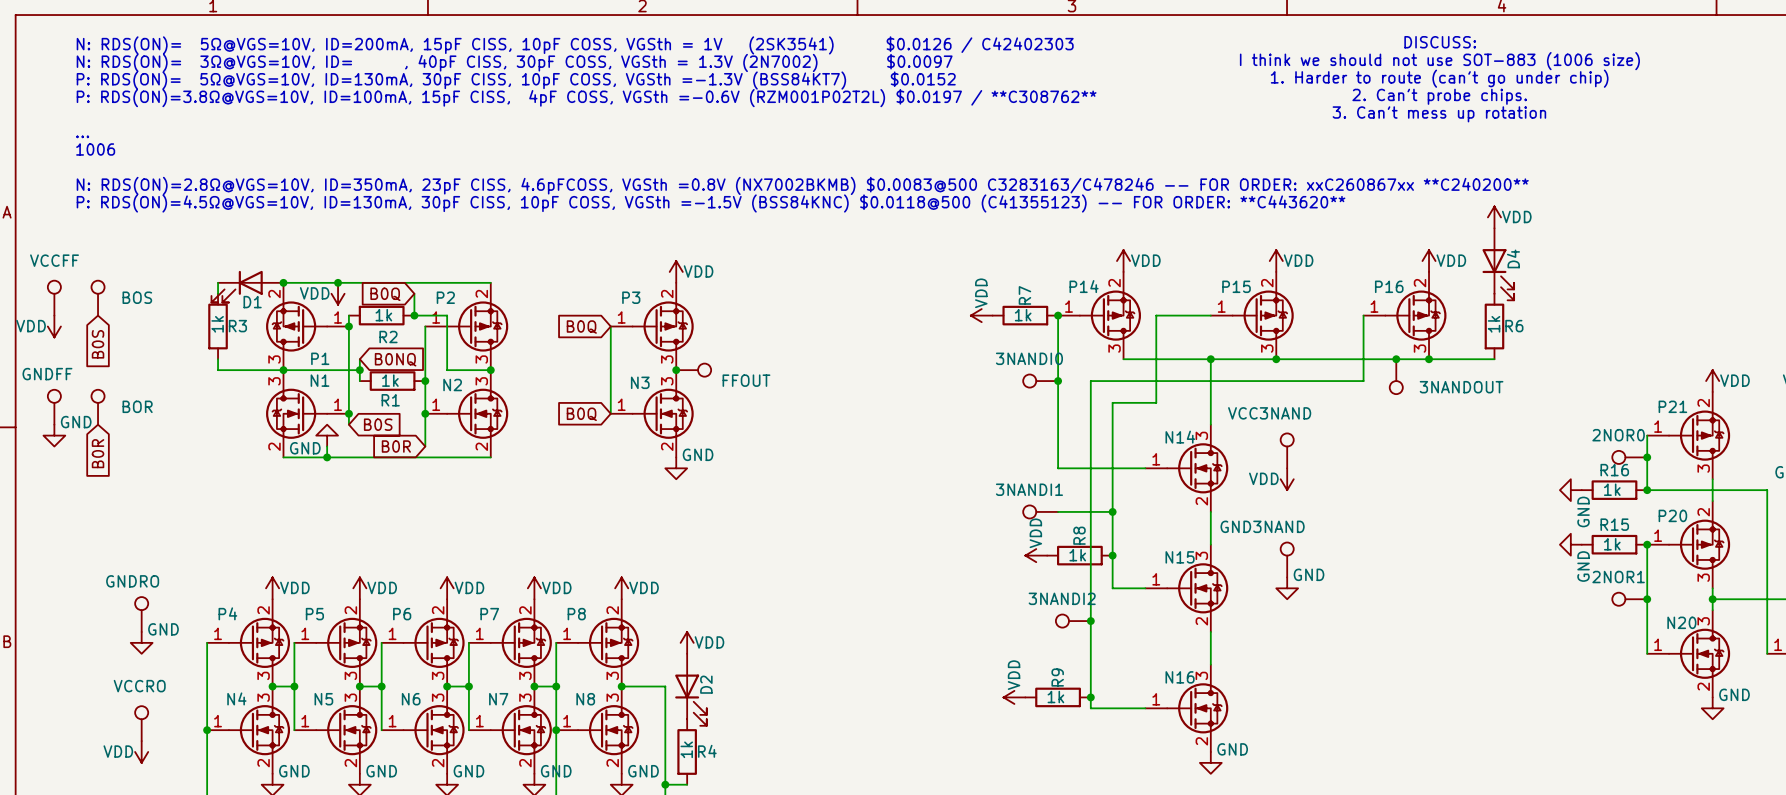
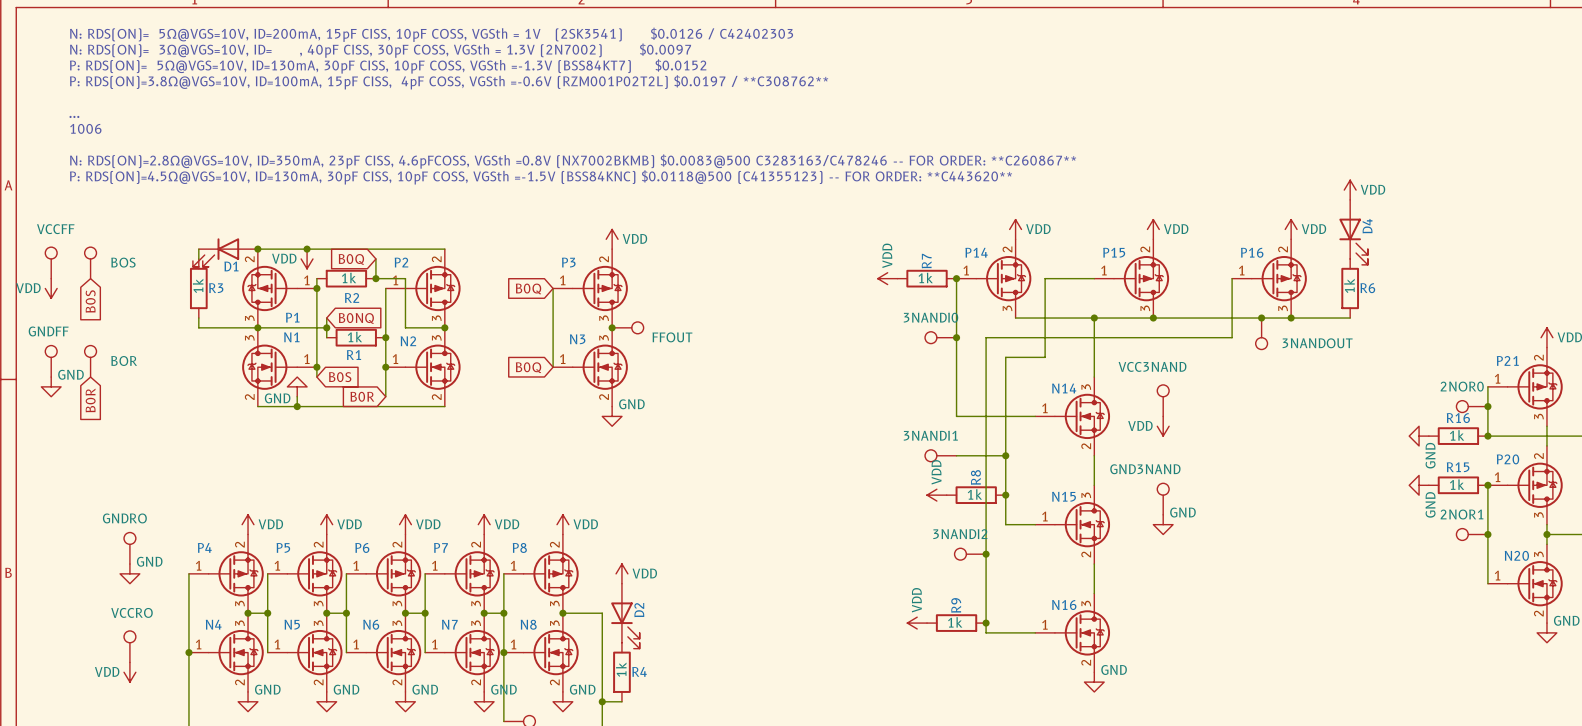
text: DISCUSS: (1440, 42) -> none
text: I think we should not use SOT-883 (1006 size) (1439, 61) -> none
text: 1. Harder to route (can't go under chip) (1439, 78) -> none
text: 2. Can't probe chips. (1439, 96) -> none
text: 3. Can't mess up rotation (1439, 114) -> none
text: N: RDS(ON)=2.8Ω@VGS=10V, ID=350mA, 23pF CISS, 4.6pFCOSS, VGSth =0.8V (NX7002BKMB) $0.0083@500 C3283163/C478246 -- FOR ORDER: xxC260867xx **C240200** (802, 185) -> N: RDS(ON)=2.8Ω@VGS=10V, ID=350mA, 23pF CISS, 4.6pFCOSS, VGSth =0.8V (NX7002BKMB) $0.0083@500 C3283163/C478246 -- FOR ORDER: **C260867** (573, 161)

